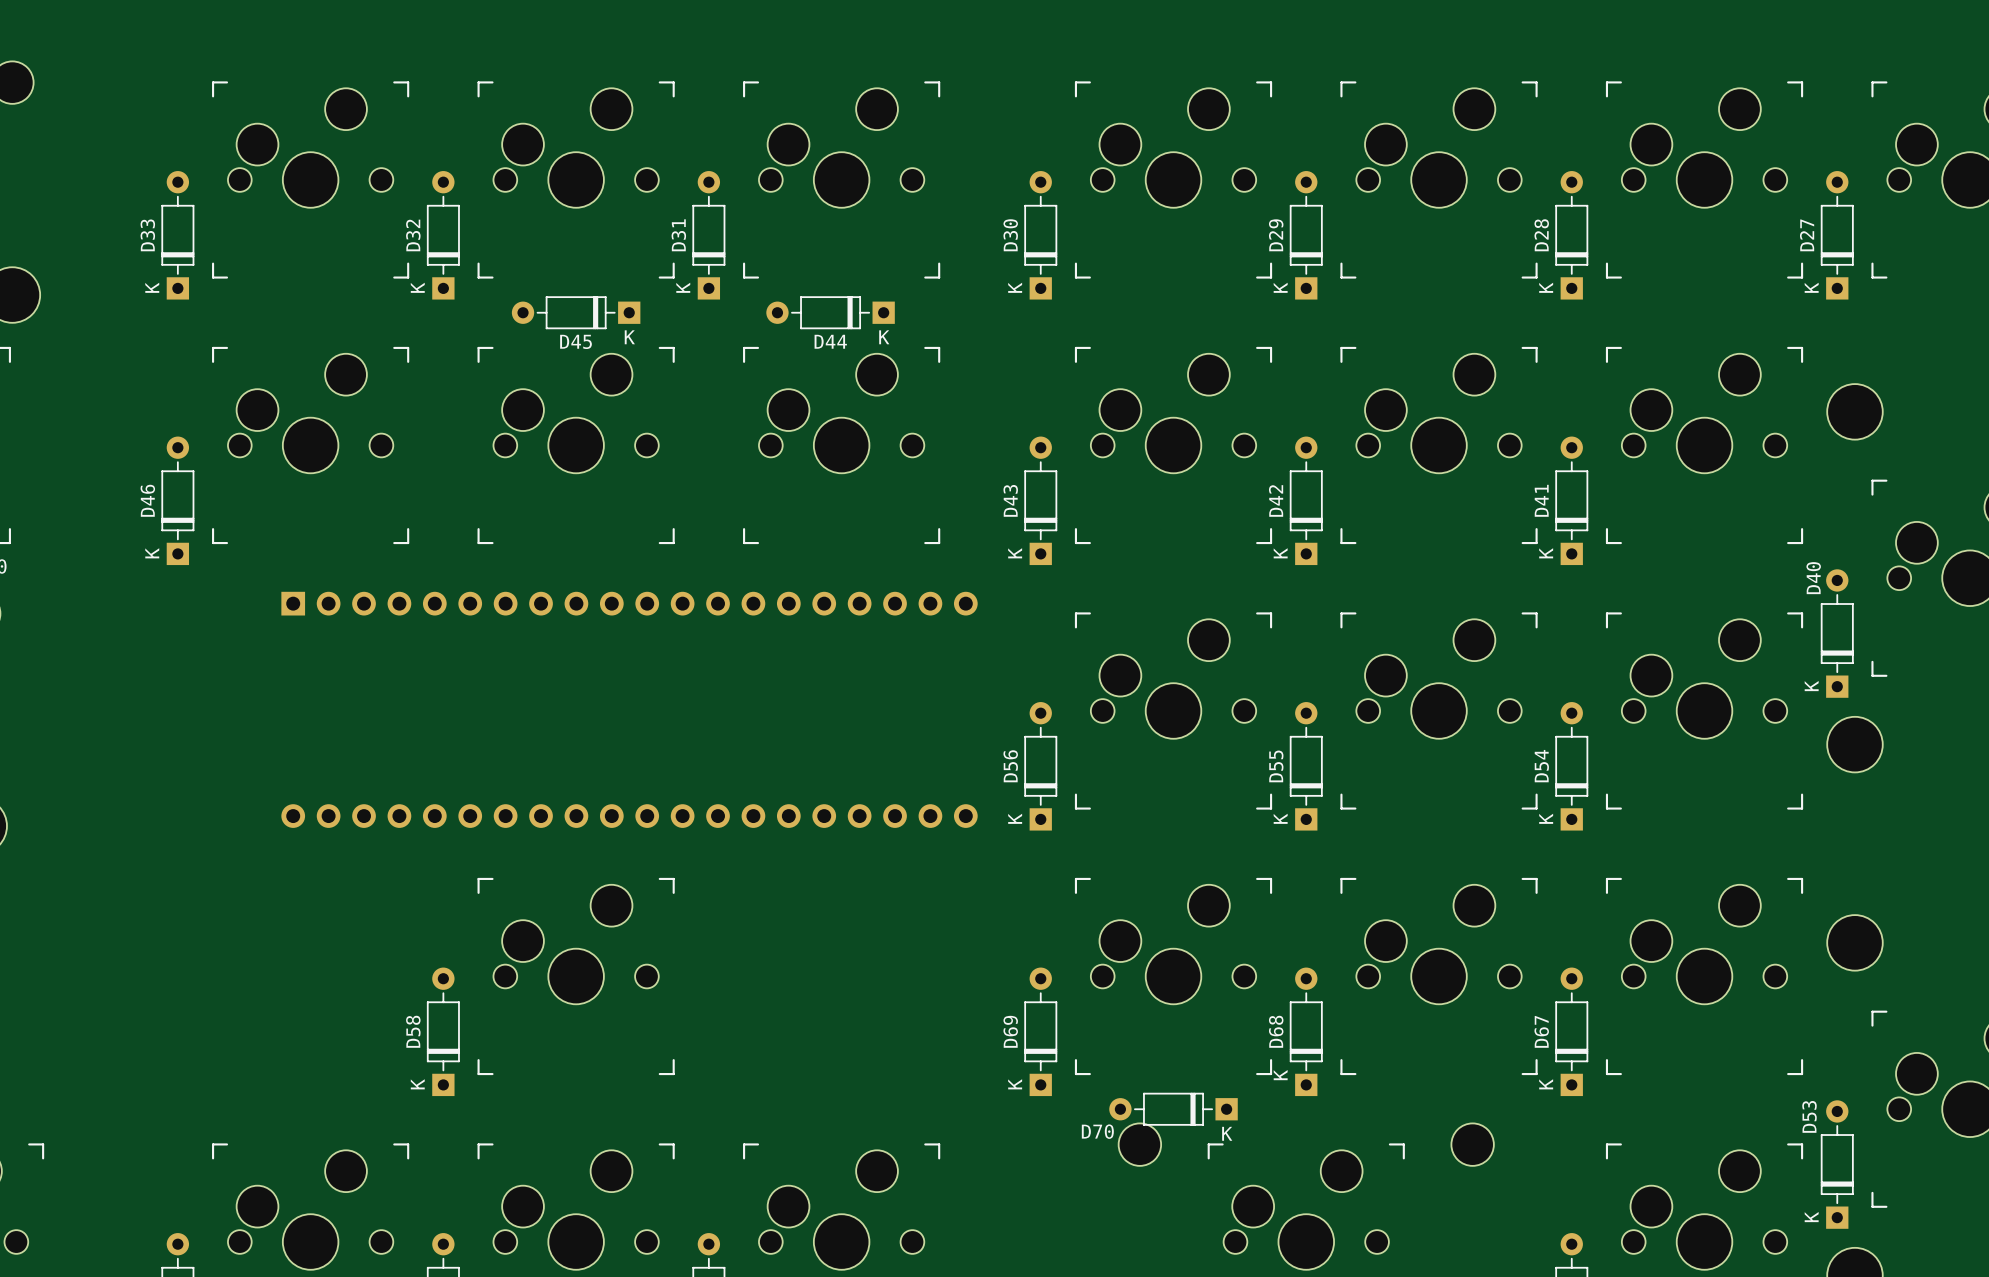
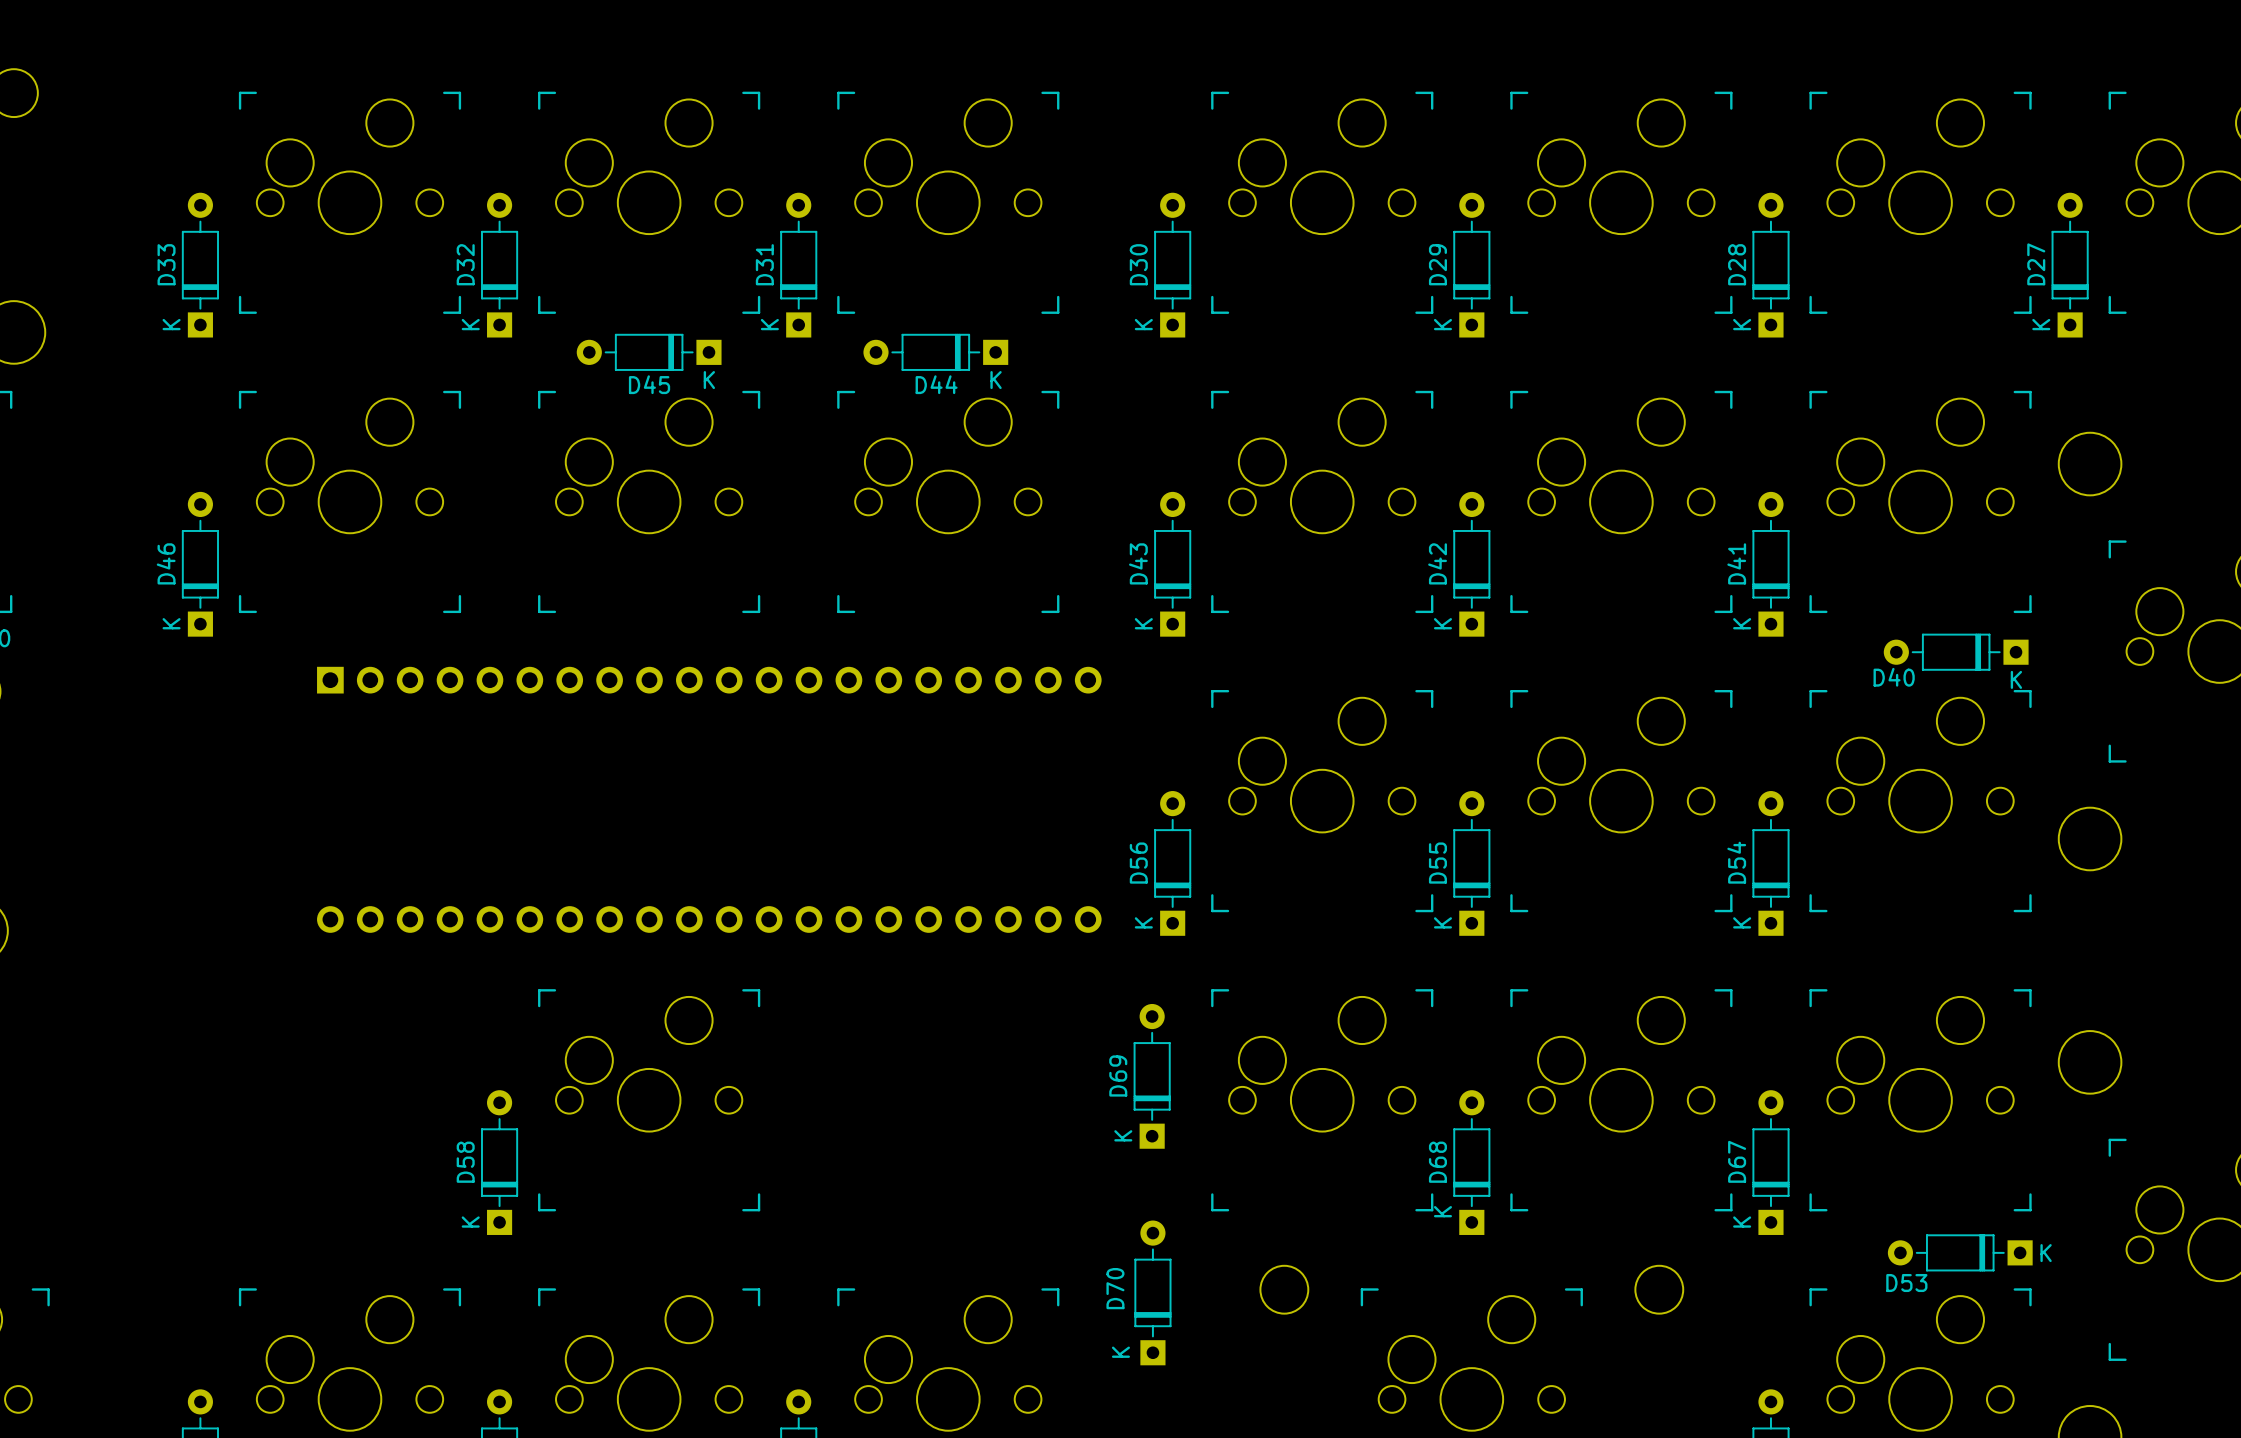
D40 rotation: 0° (1837, 633) -> 90° counterclockwise (1956, 652)
D40 position: (1837, 633) -> (1956, 652)
D69 position: (1040, 1031) -> (1152, 1076)
D70 footprint: [1109, 1092, 1238, 1126] -> [1134, 1220, 1172, 1366]
D53 footprint: [1820, 1100, 1854, 1229] -> [1887, 1234, 2033, 1272]
D53 name position: D53 (1809, 1116) -> D53 (1906, 1283)
D70 name position: D70 (1097, 1131) -> D70 (1115, 1288)

